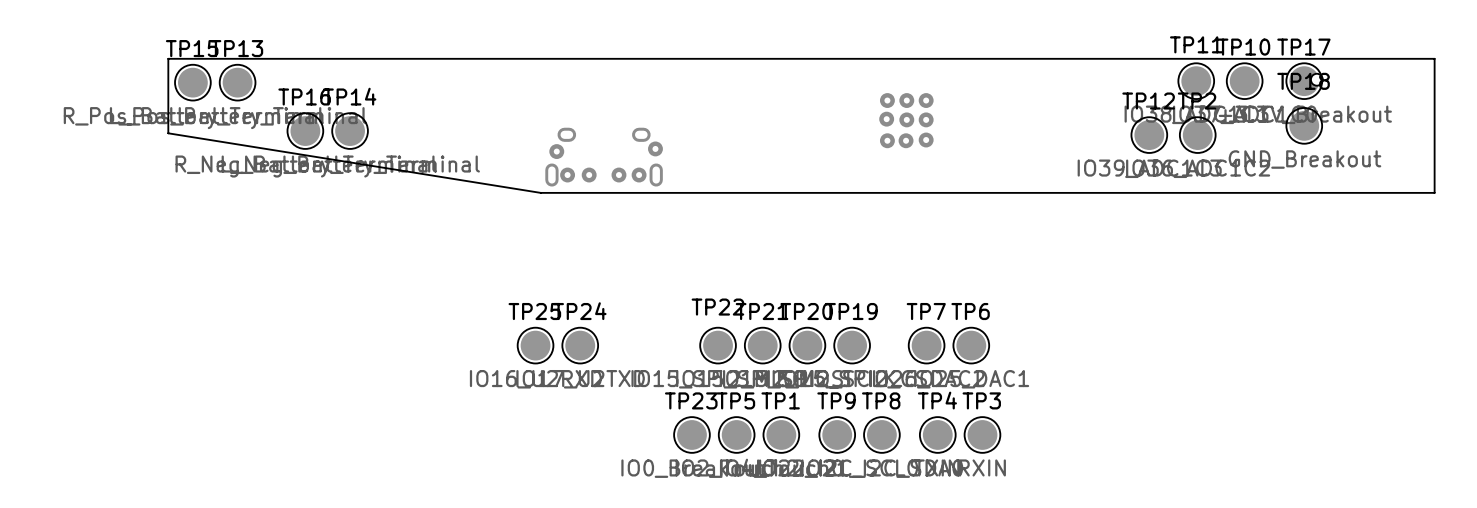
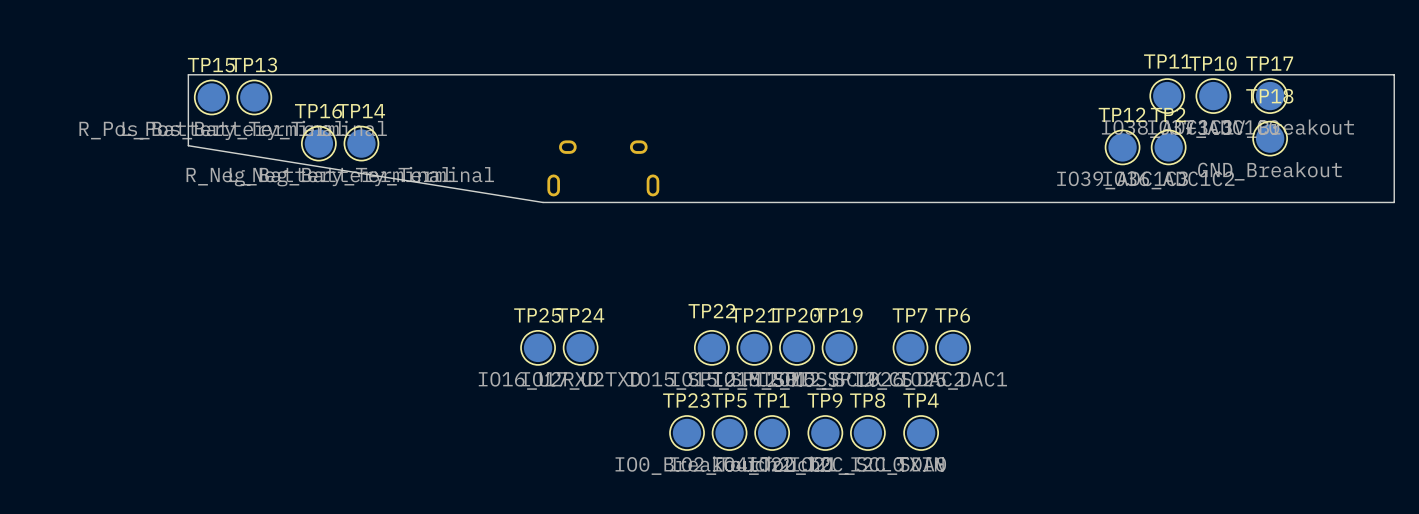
part: (1316, 79) -> none
via: (887, 100) -> none
via: (906, 100) -> none
via: (926, 100) -> none
via: (886, 119) -> none
via: (906, 119) -> none
via: (926, 119) -> none
via: (887, 140) -> none
via: (906, 140) -> none
via: (926, 140) -> none
via: (655, 148) -> none
via: (556, 151) -> none
via: (567, 175) -> none
via: (589, 175) -> none
via: (618, 175) -> none
via: (639, 175) -> none
TP3: RXIN (982, 434) -> none

